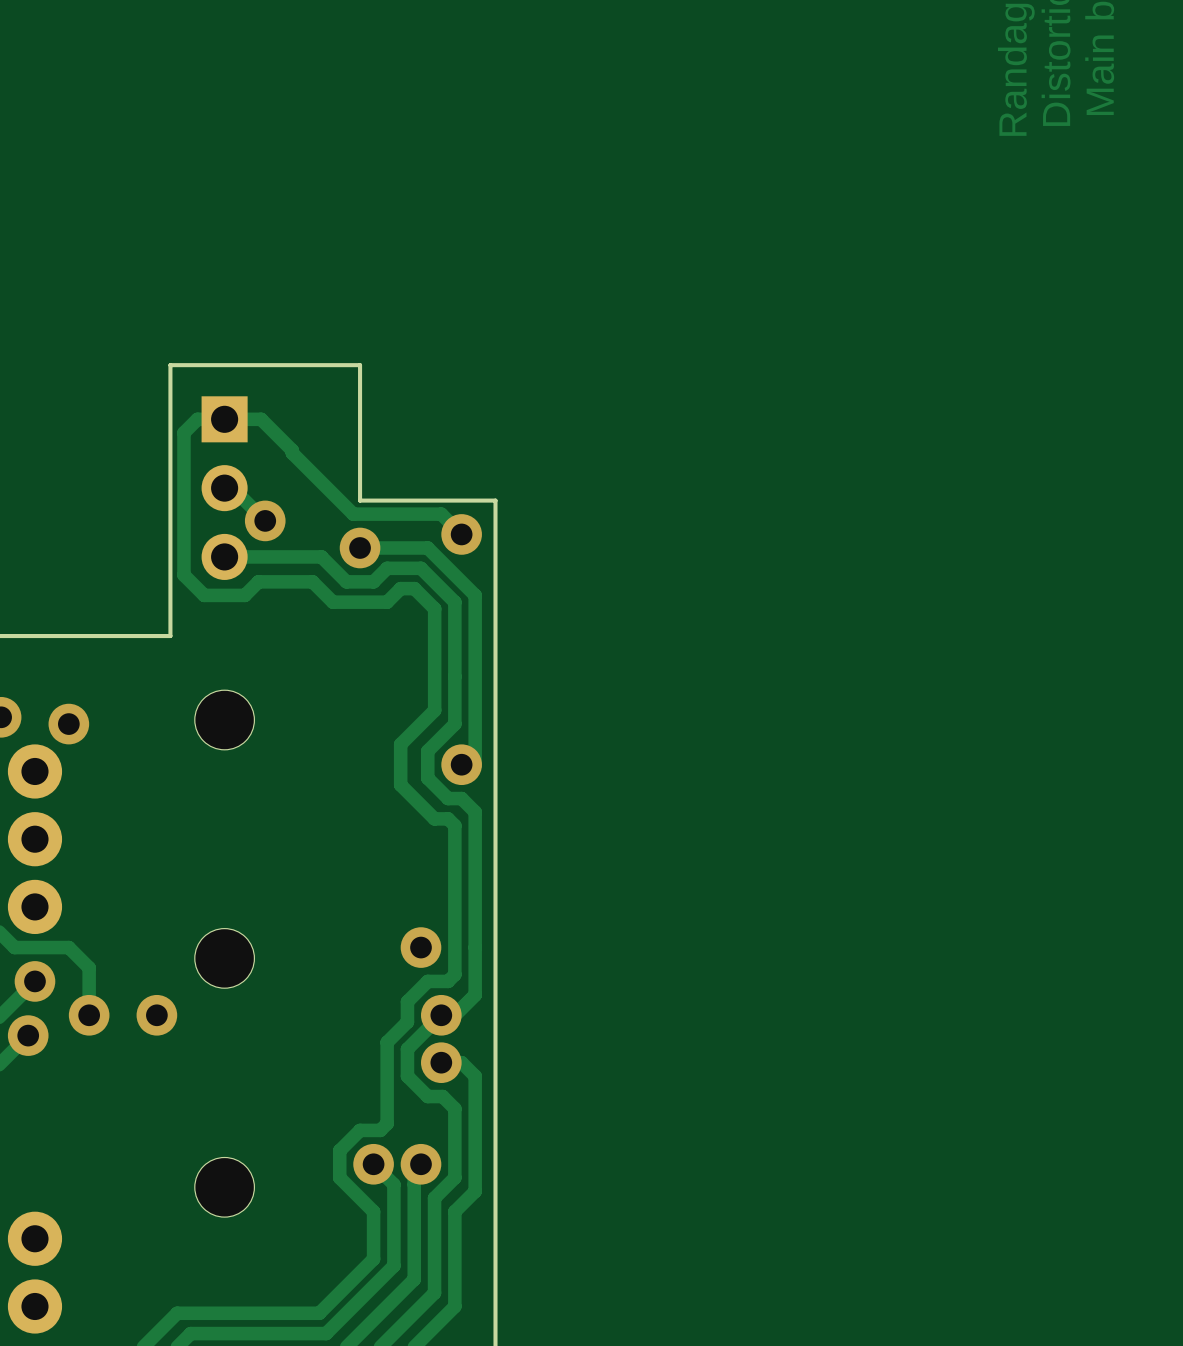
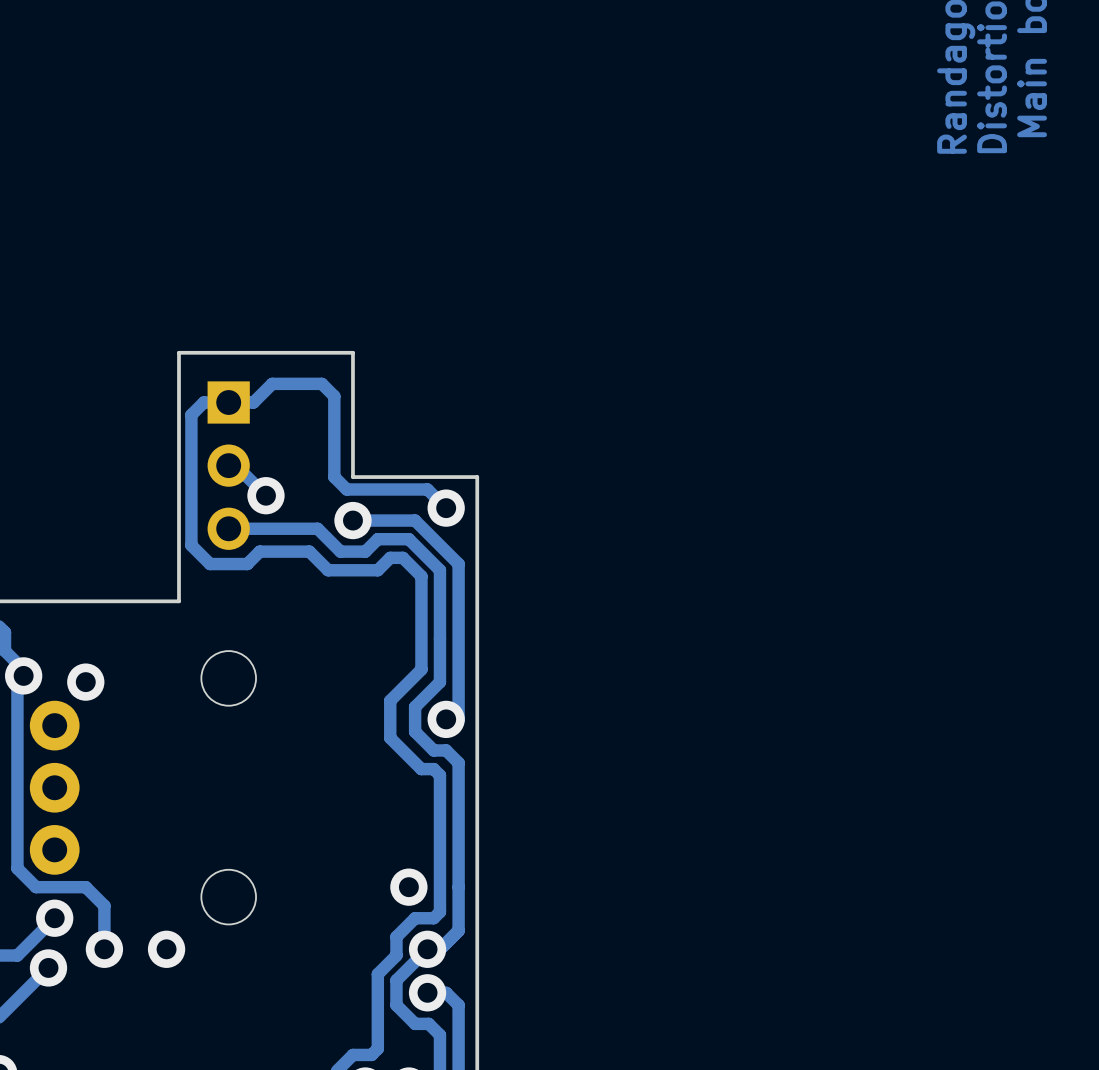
track: (251, 419) (261, 419) (339, 500) -> (253, 402) (272, 383) (321, 383) (334, 396) (334, 477)

